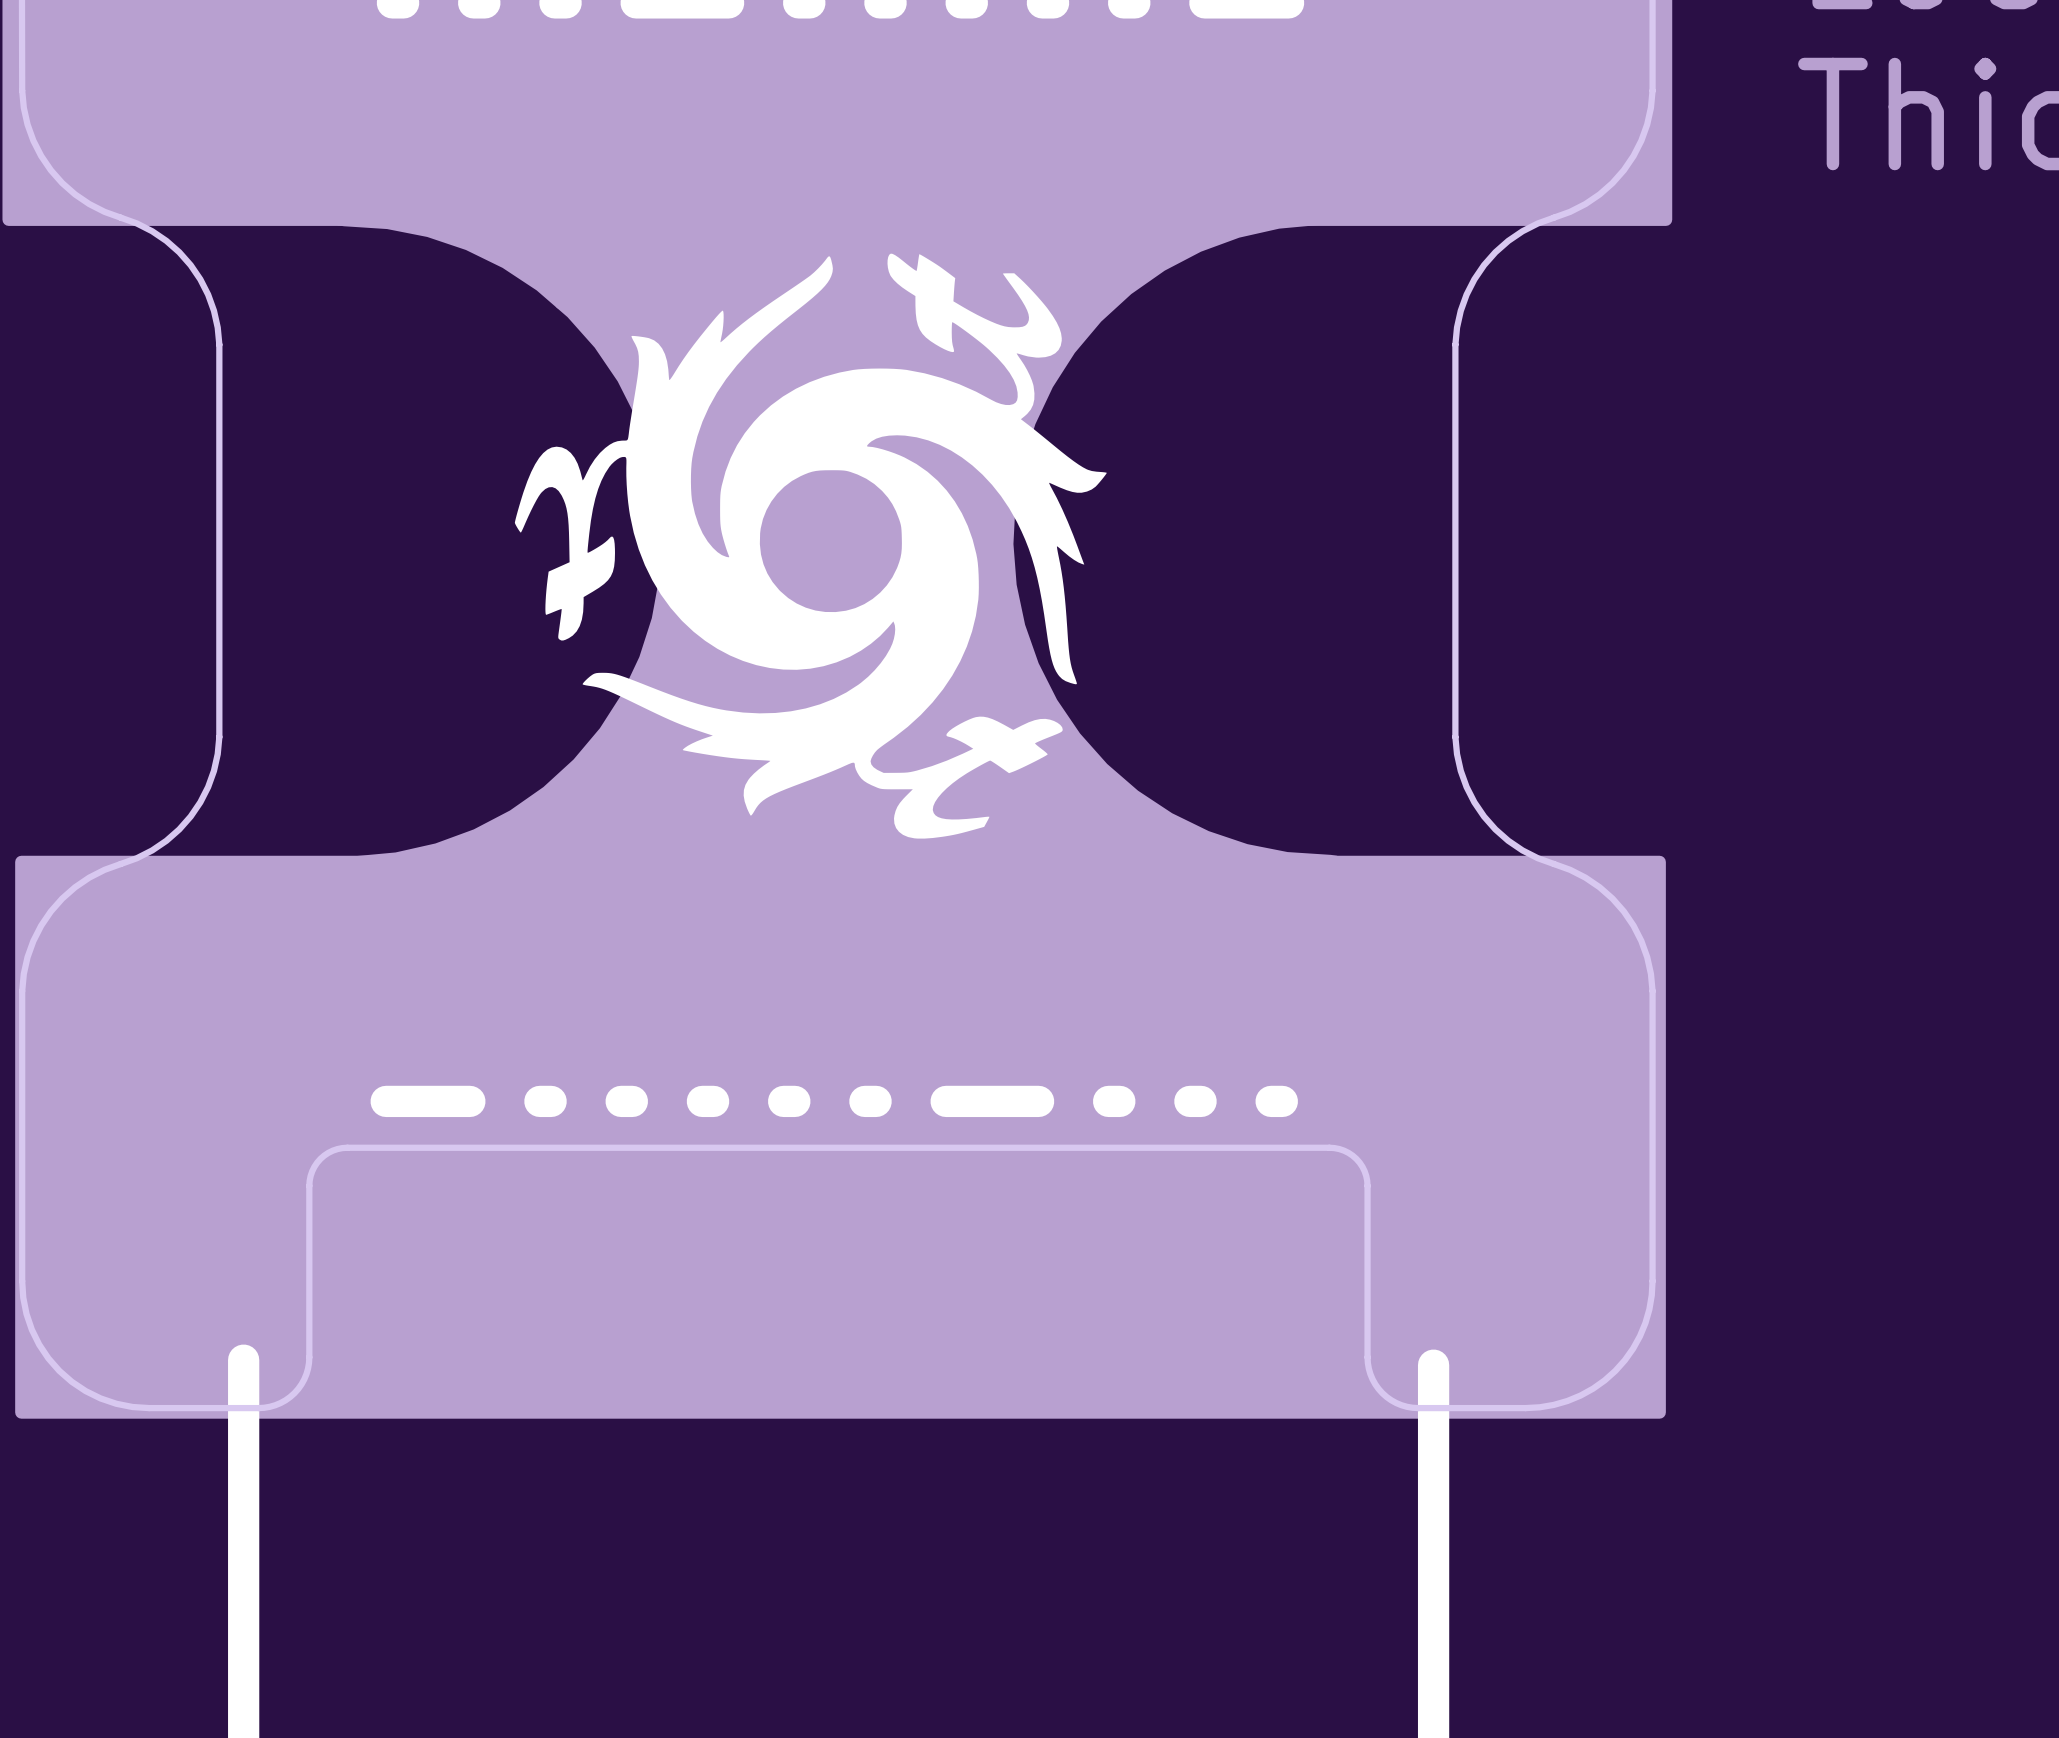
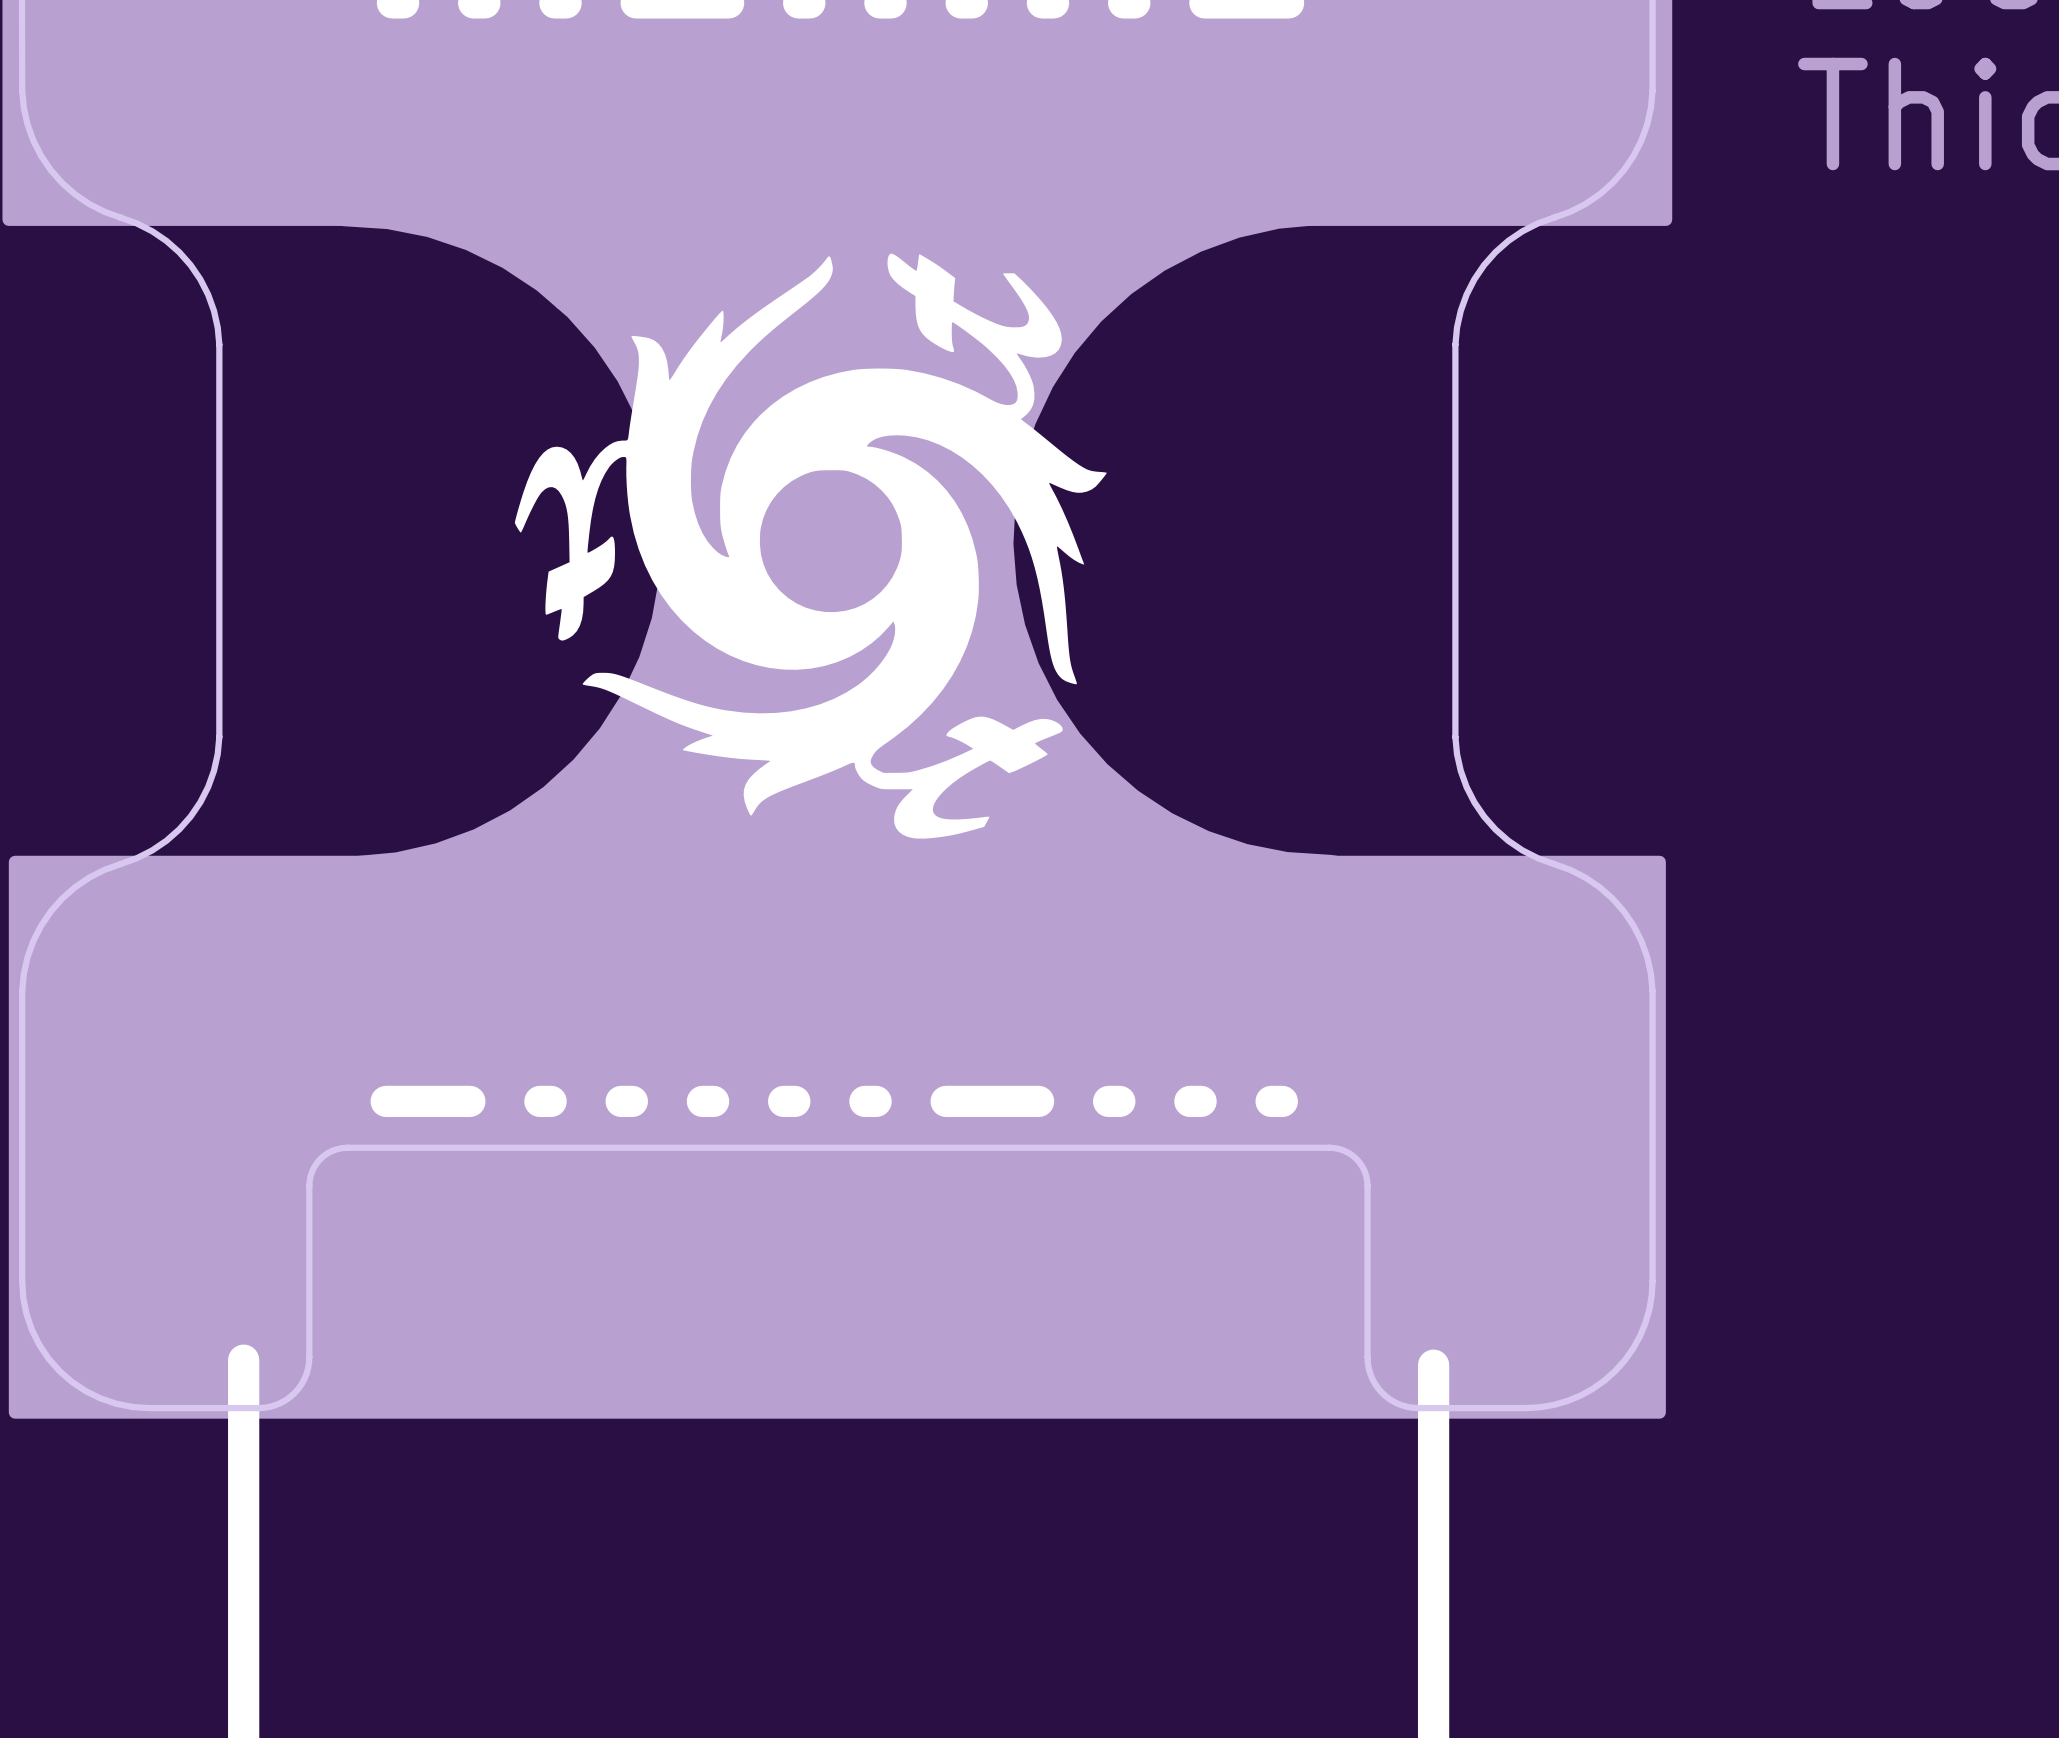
drawing shape: [15, 855, 1666, 1419] -> [8, 855, 1666, 1419]

